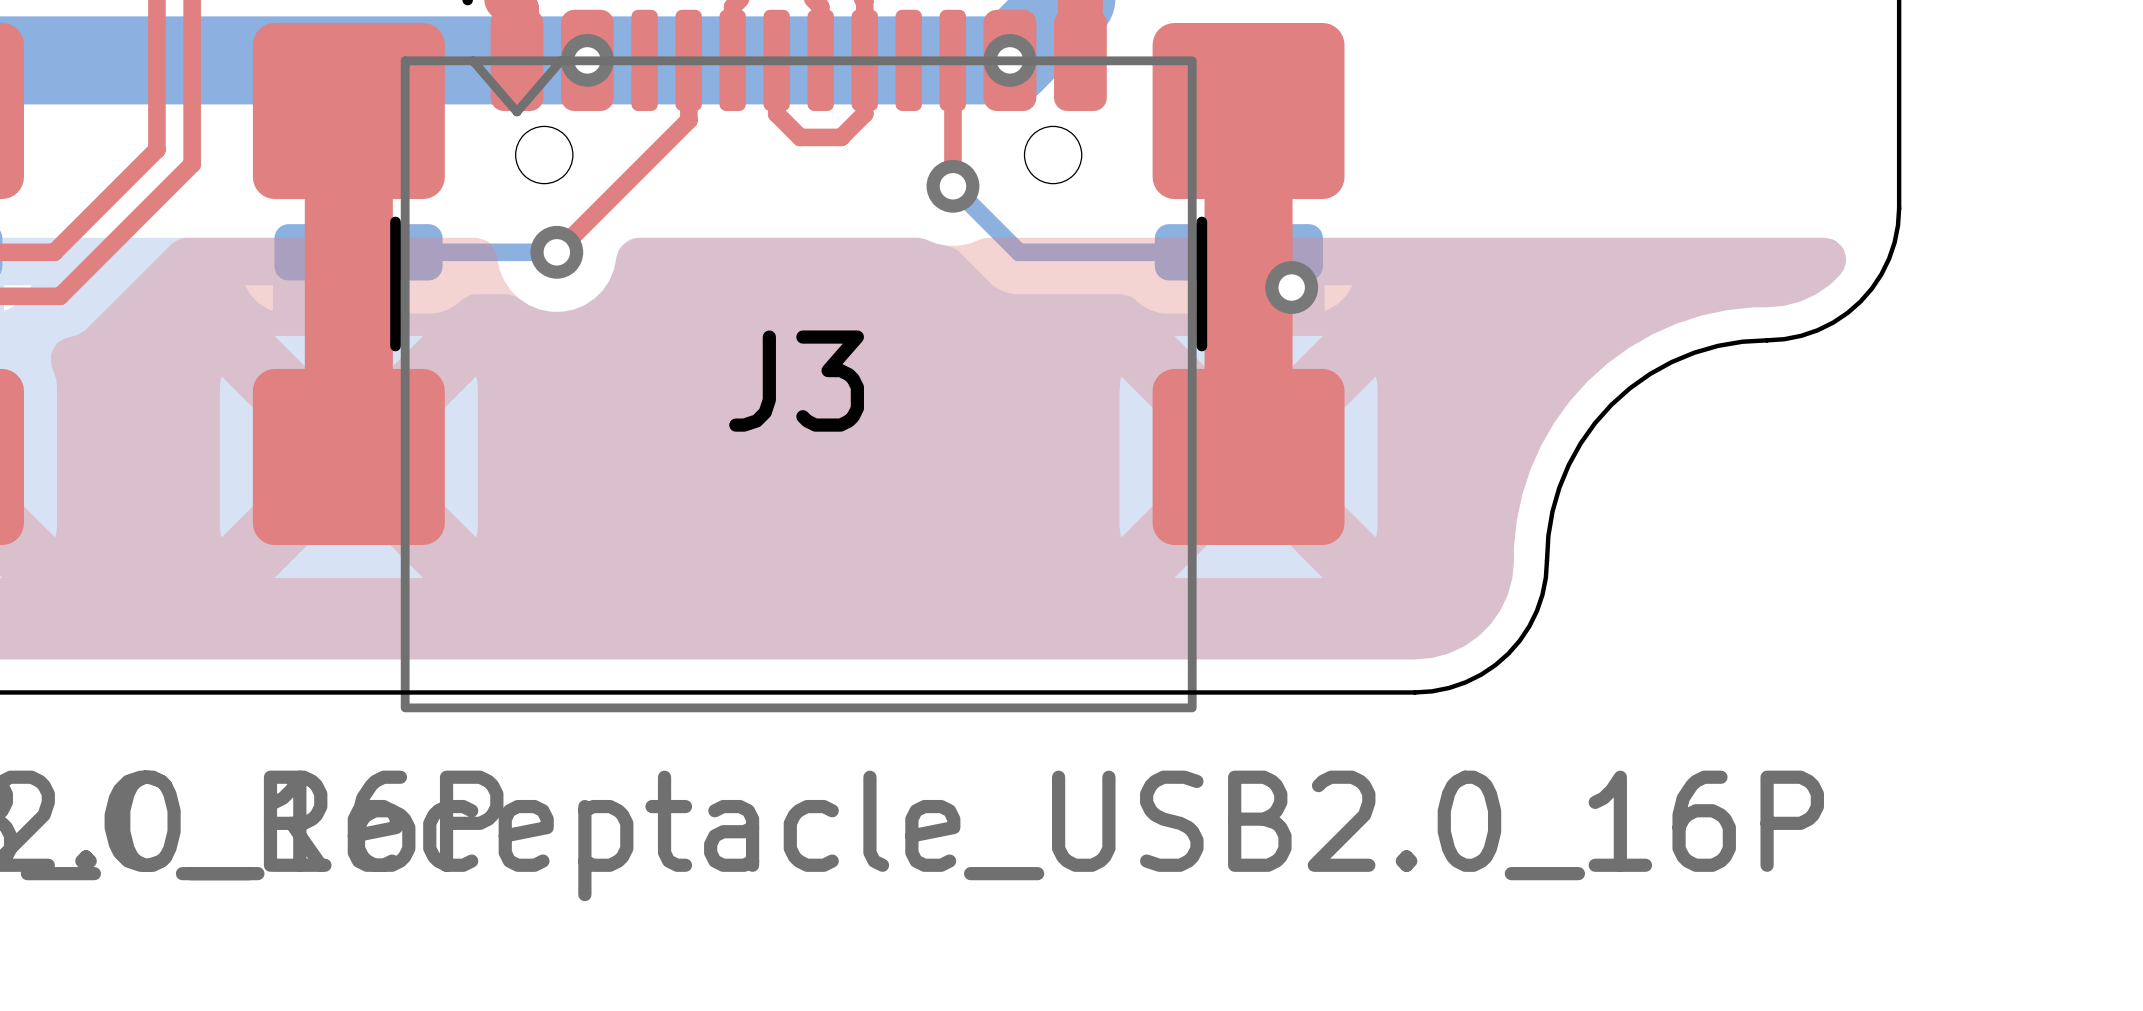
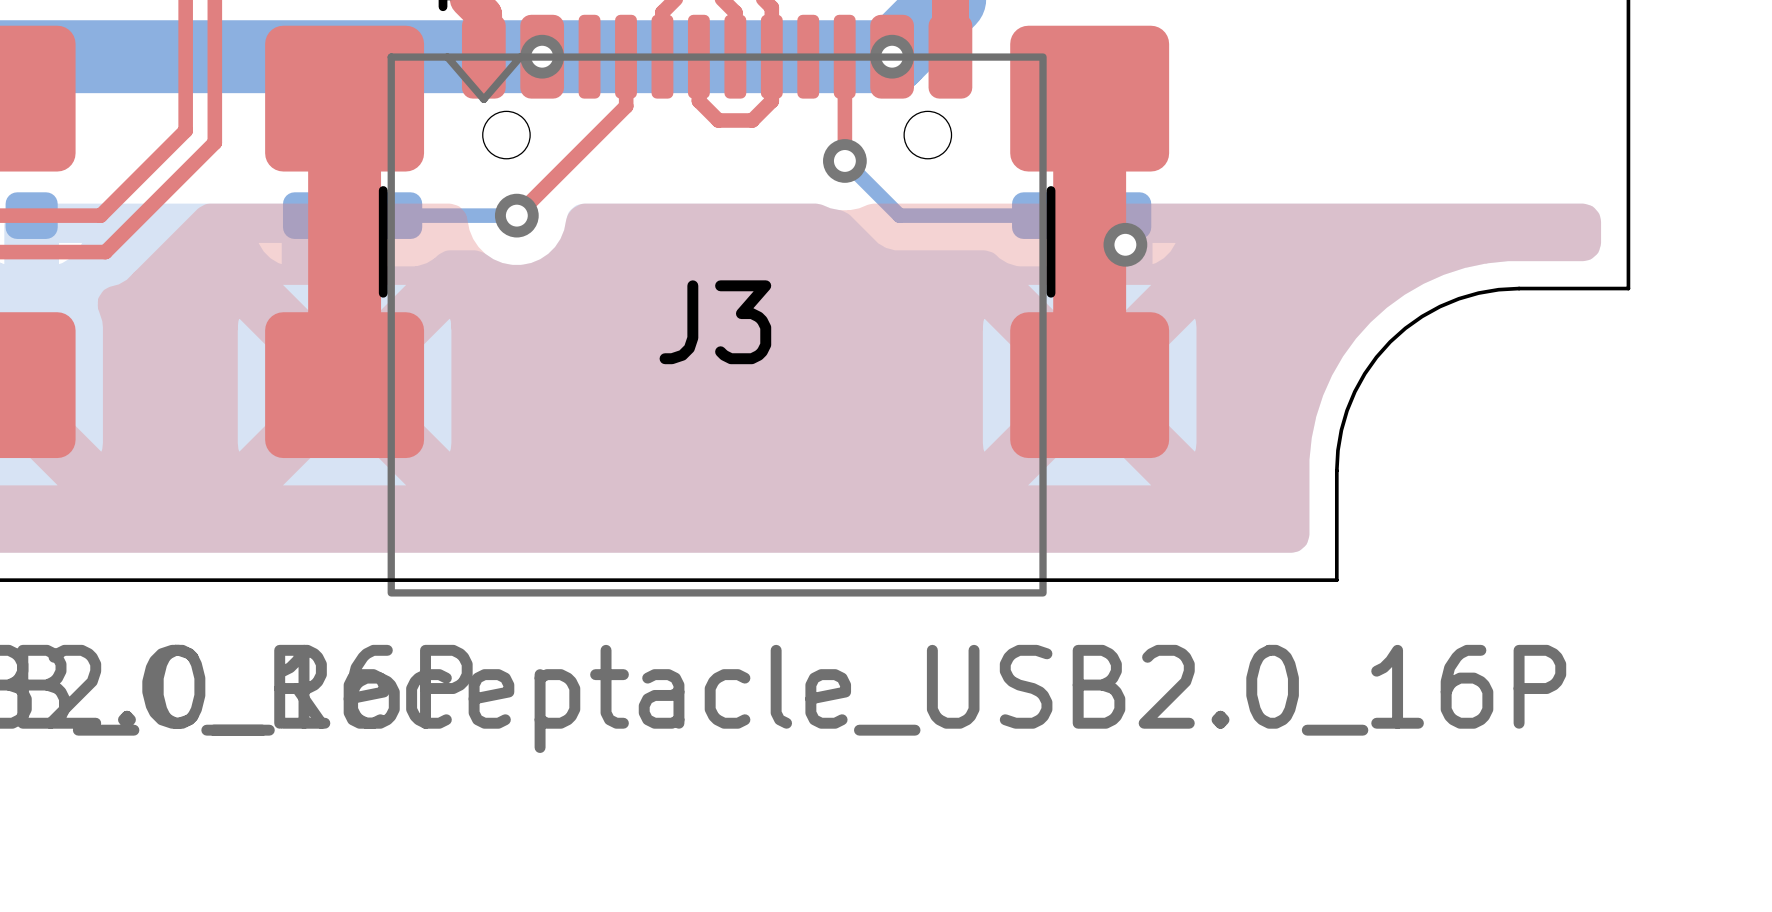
board edge: (1899, 208) (1898, 225) (1889, 258) (1881, 274) (1860, 301) (1833, 322) (1817, 330) (1784, 339) (1767, 340) -> (1628, 179) (1628, 288) (1519, 288)
board edge: (1546, 560) (1545, 577) (1536, 610) (1519, 640) (1508, 653) (1495, 665) (1465, 682) (1449, 687) (1414, 692) -> (1336, 470) (1336, 580) (1227, 580)

